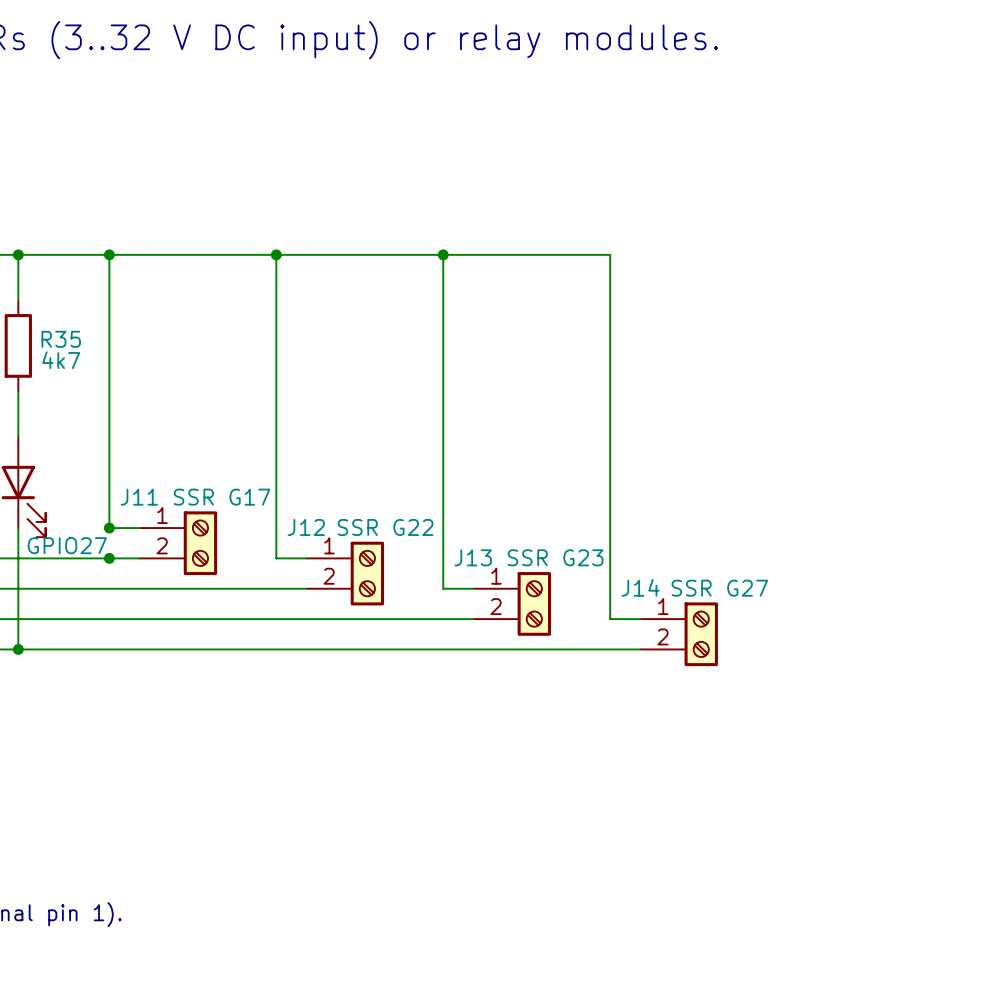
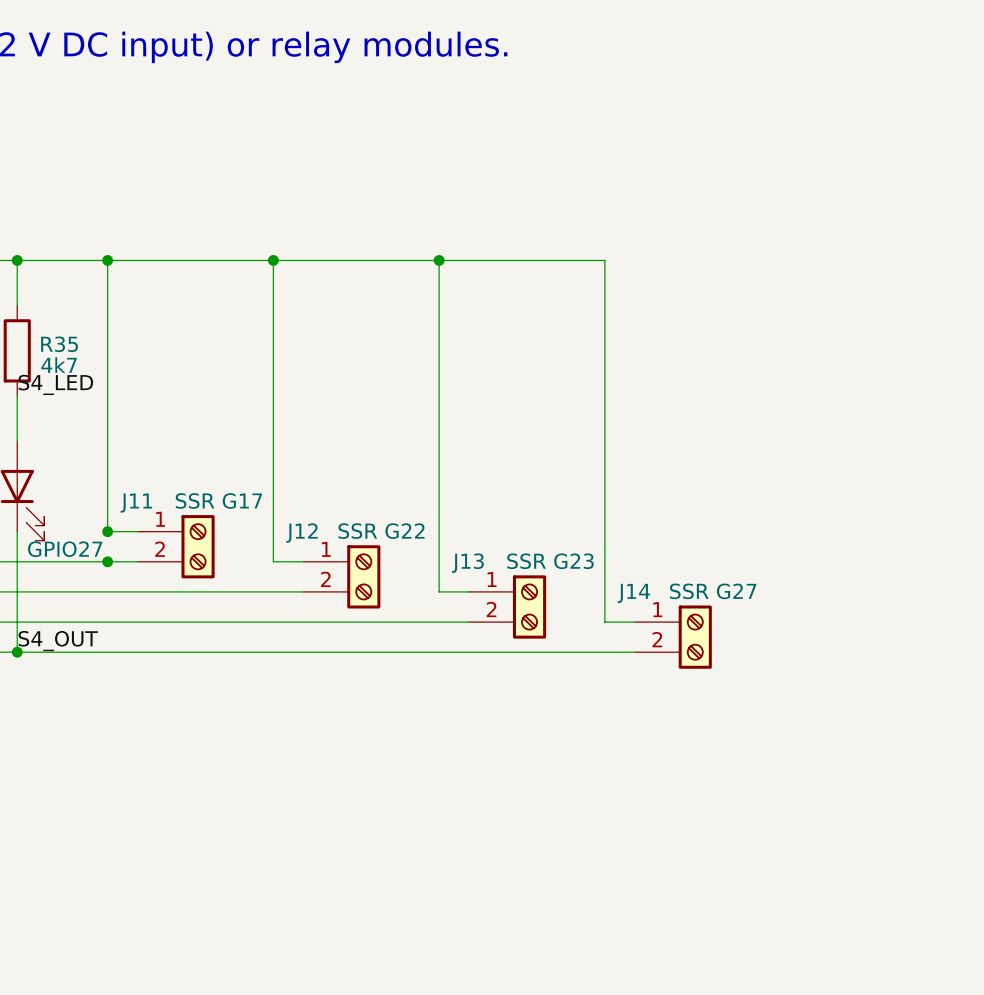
label: none -> S4_LED (55, 384)
label: none -> S4_OUT (58, 641)

